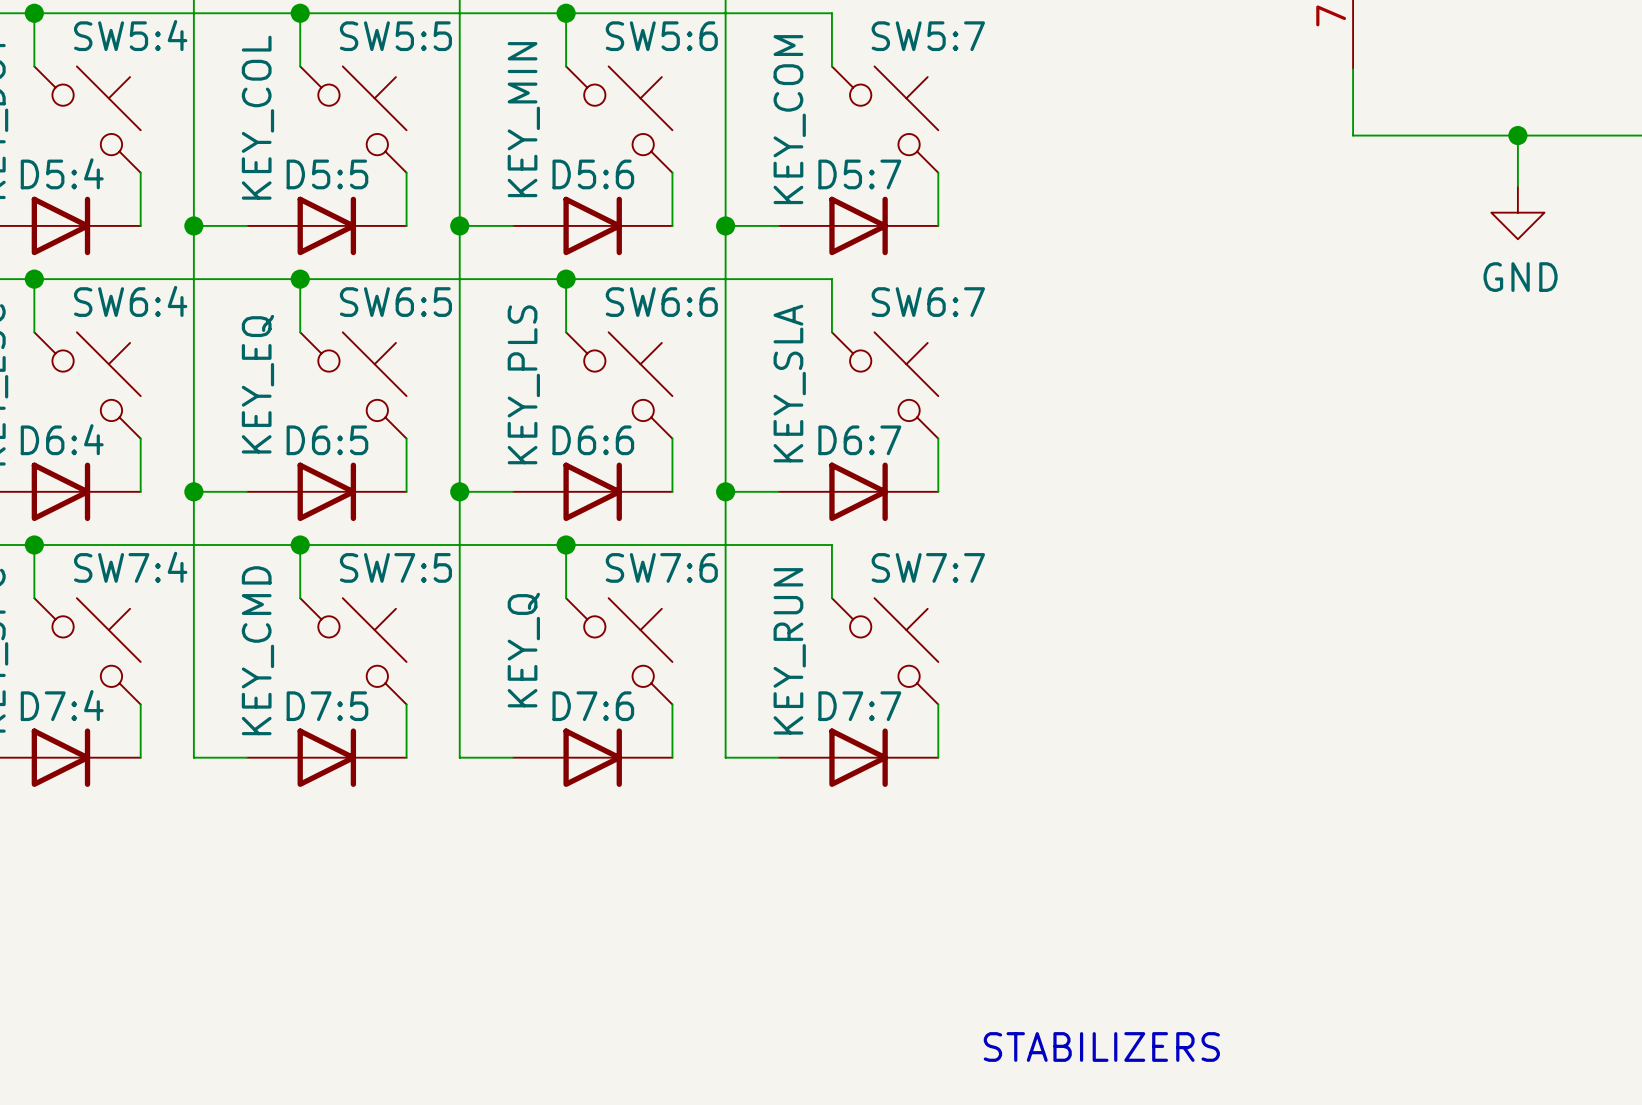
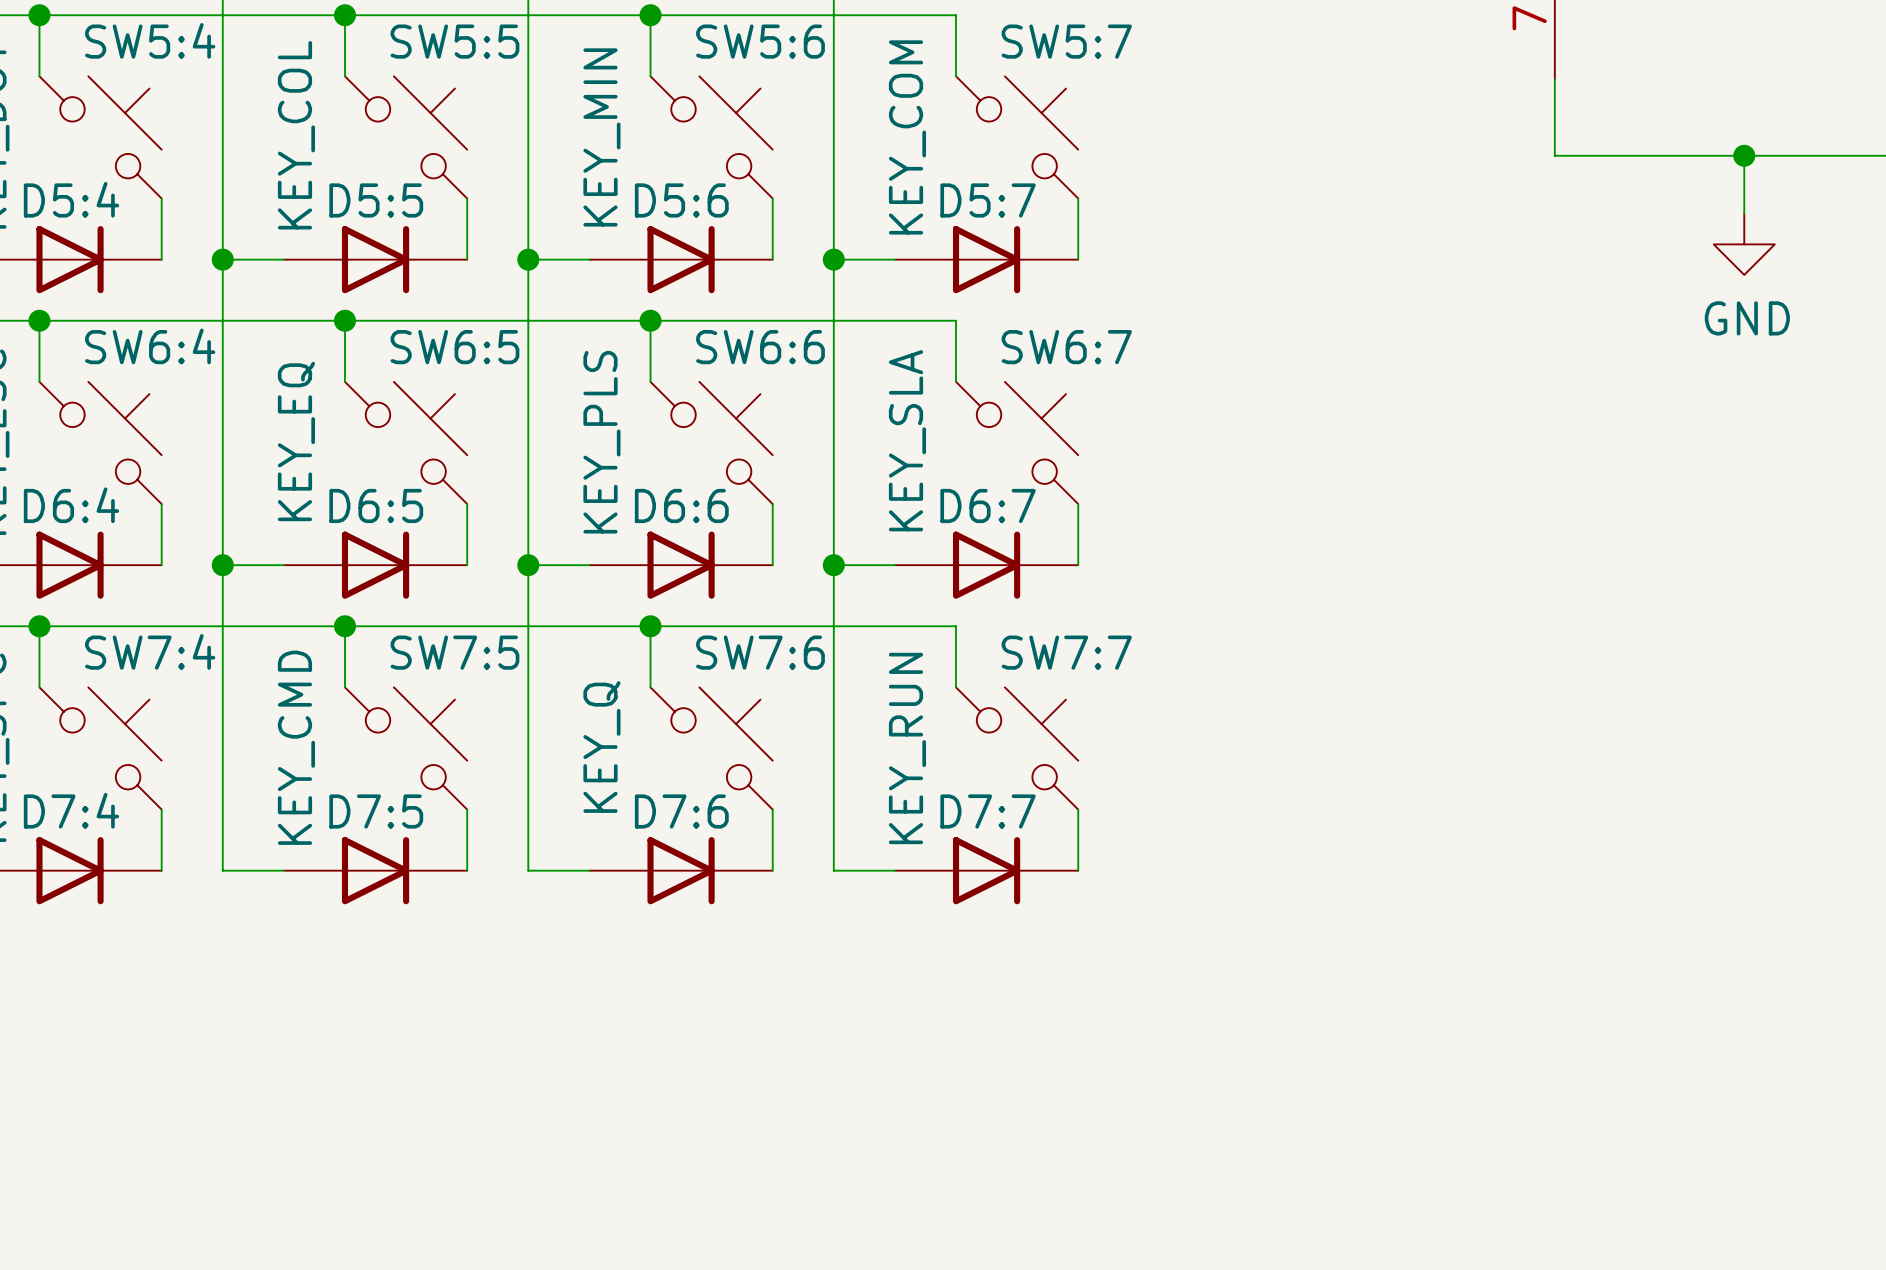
text: STABILIZERS (1101, 1046) -> none

